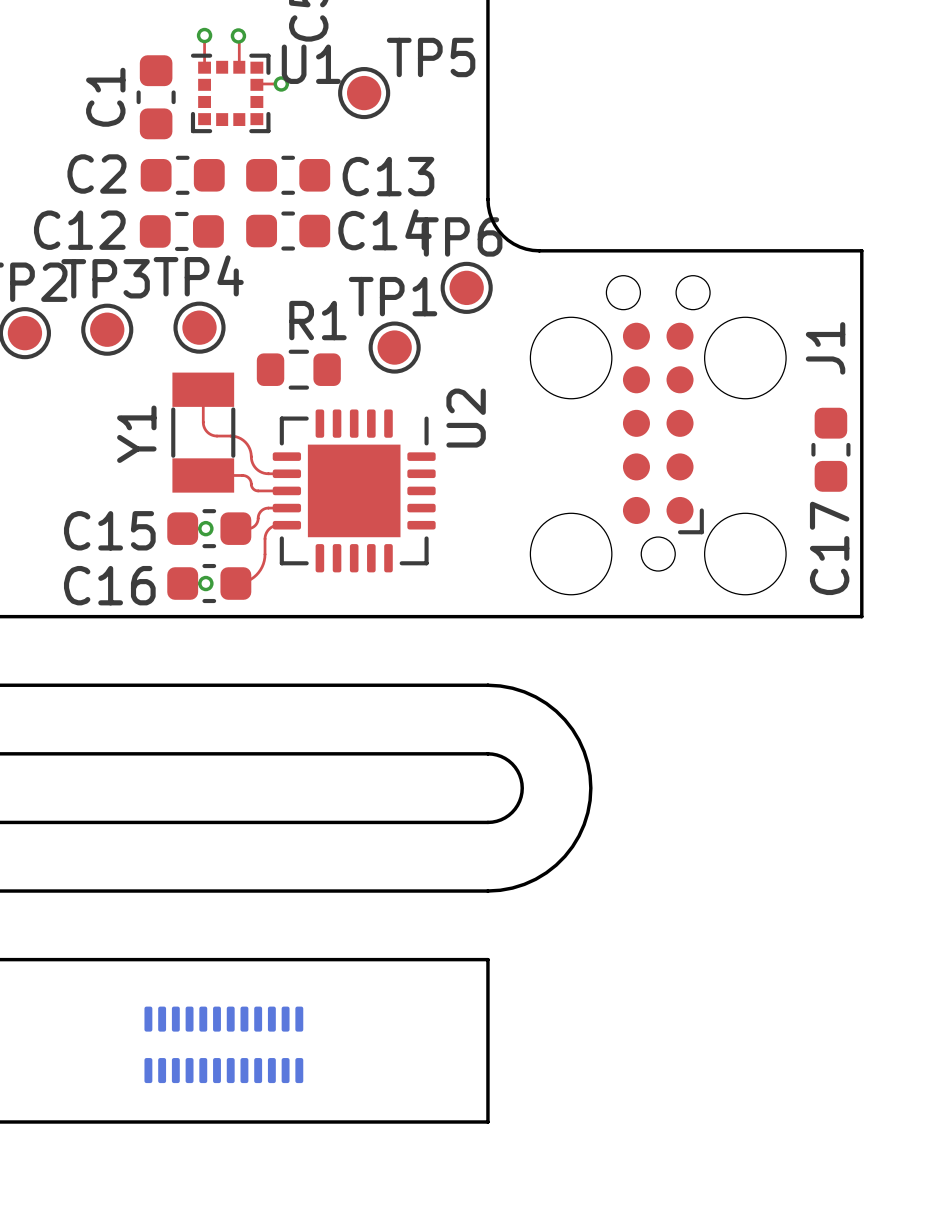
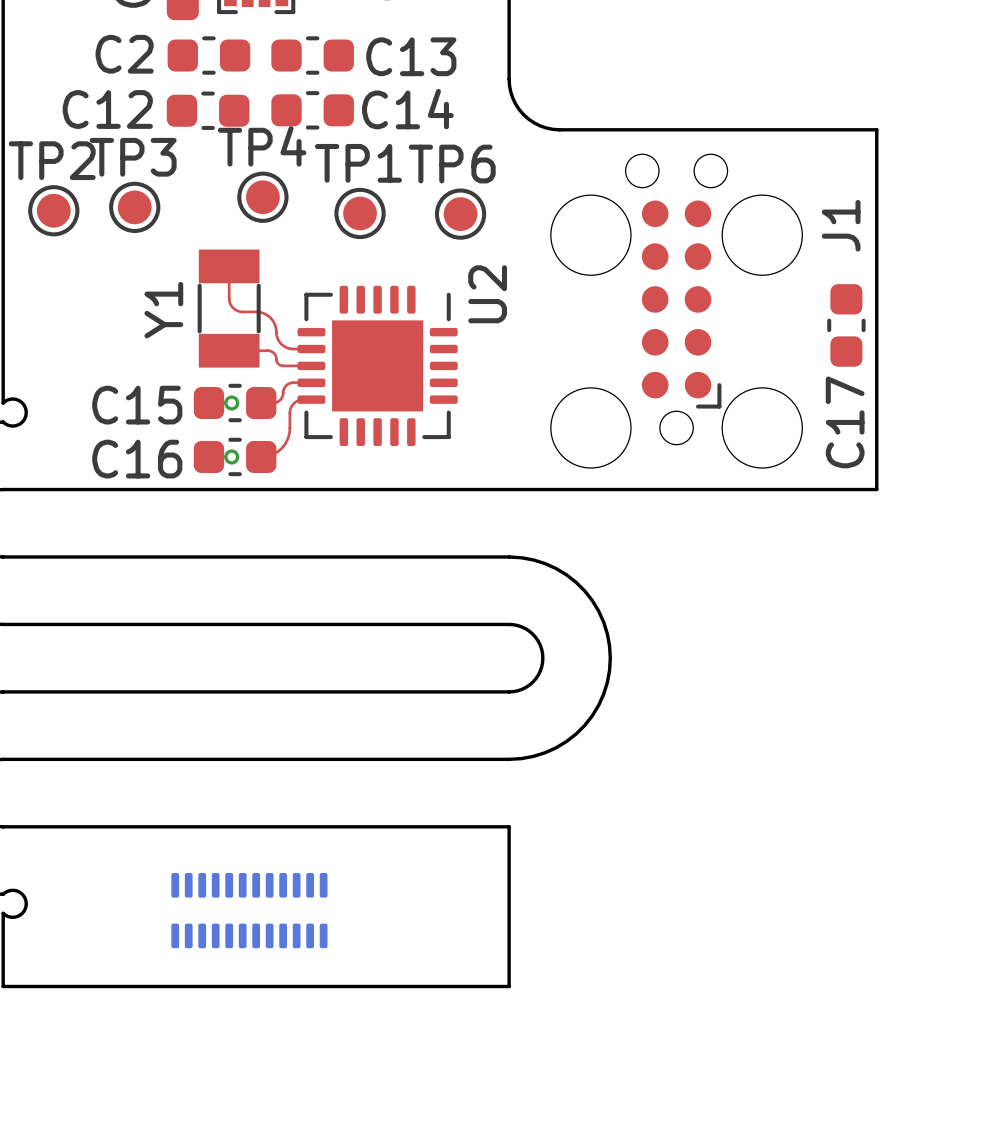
TP6 position: (466, 287) -> (460, 214)
TP4 position: (199, 327) -> (262, 197)
TP1 position: (394, 347) -> (360, 213)
R1: (298, 369) -> none

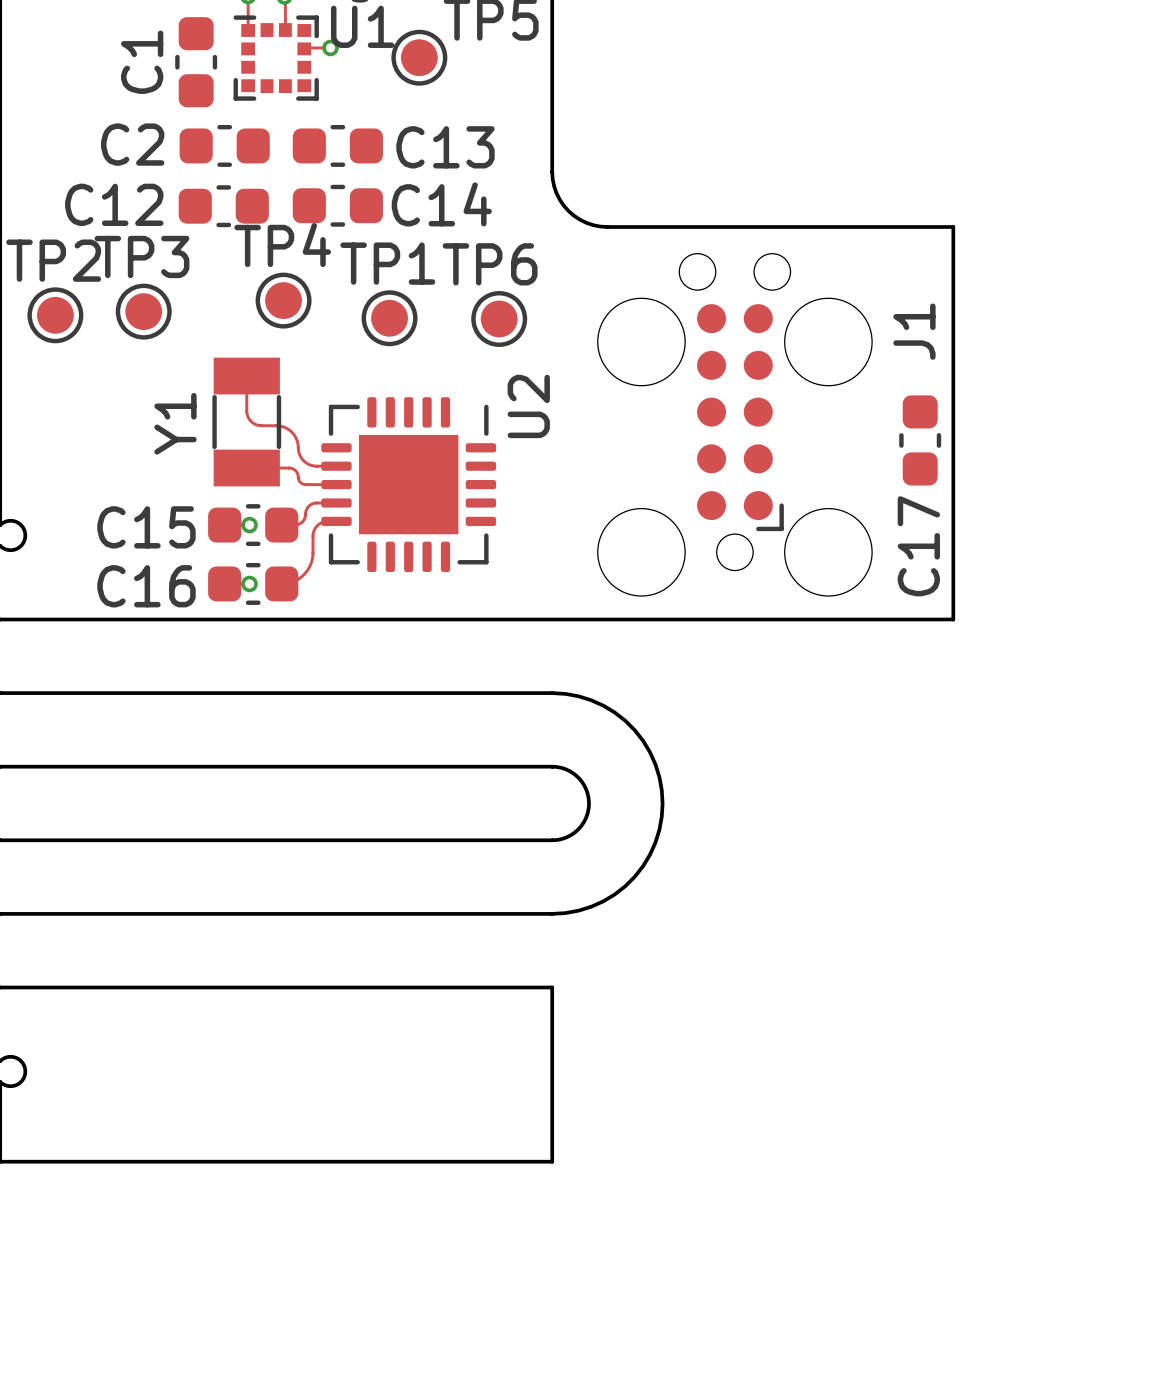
part: (249, 910) -> none

